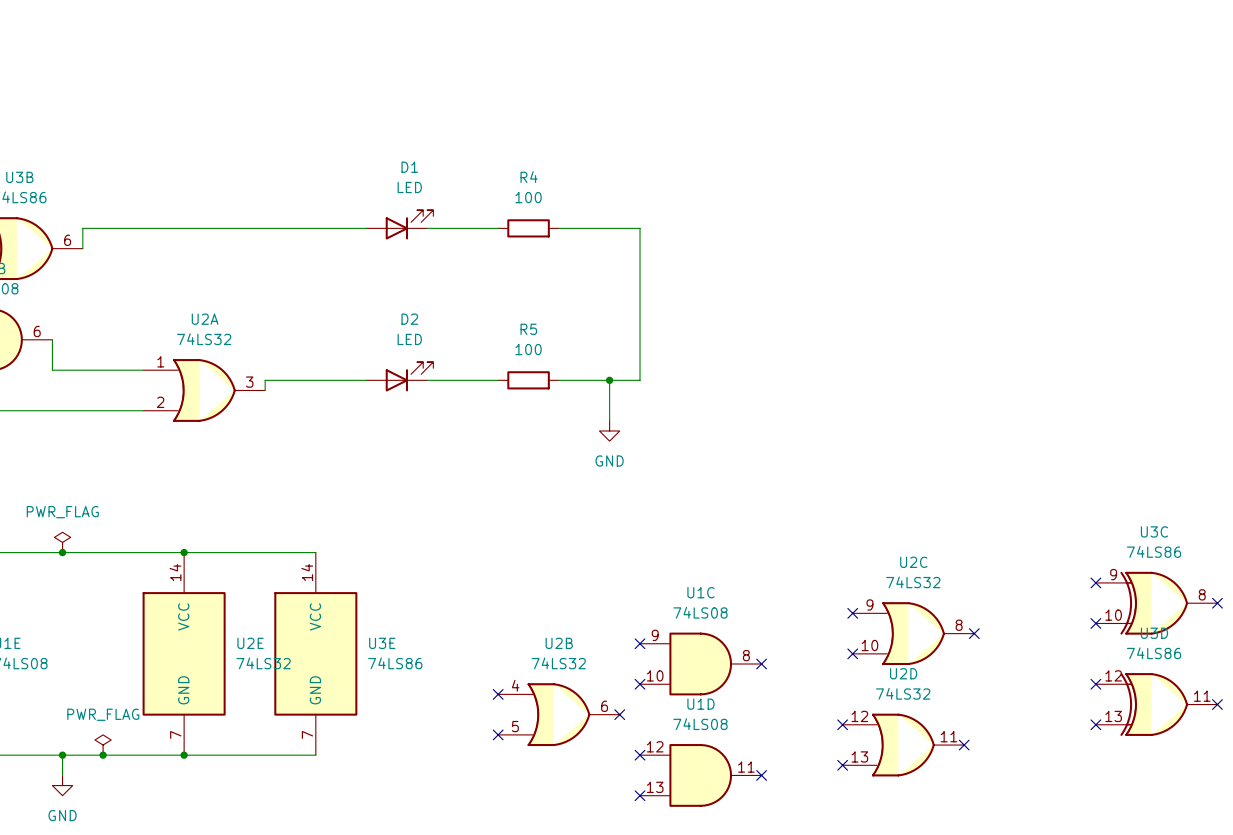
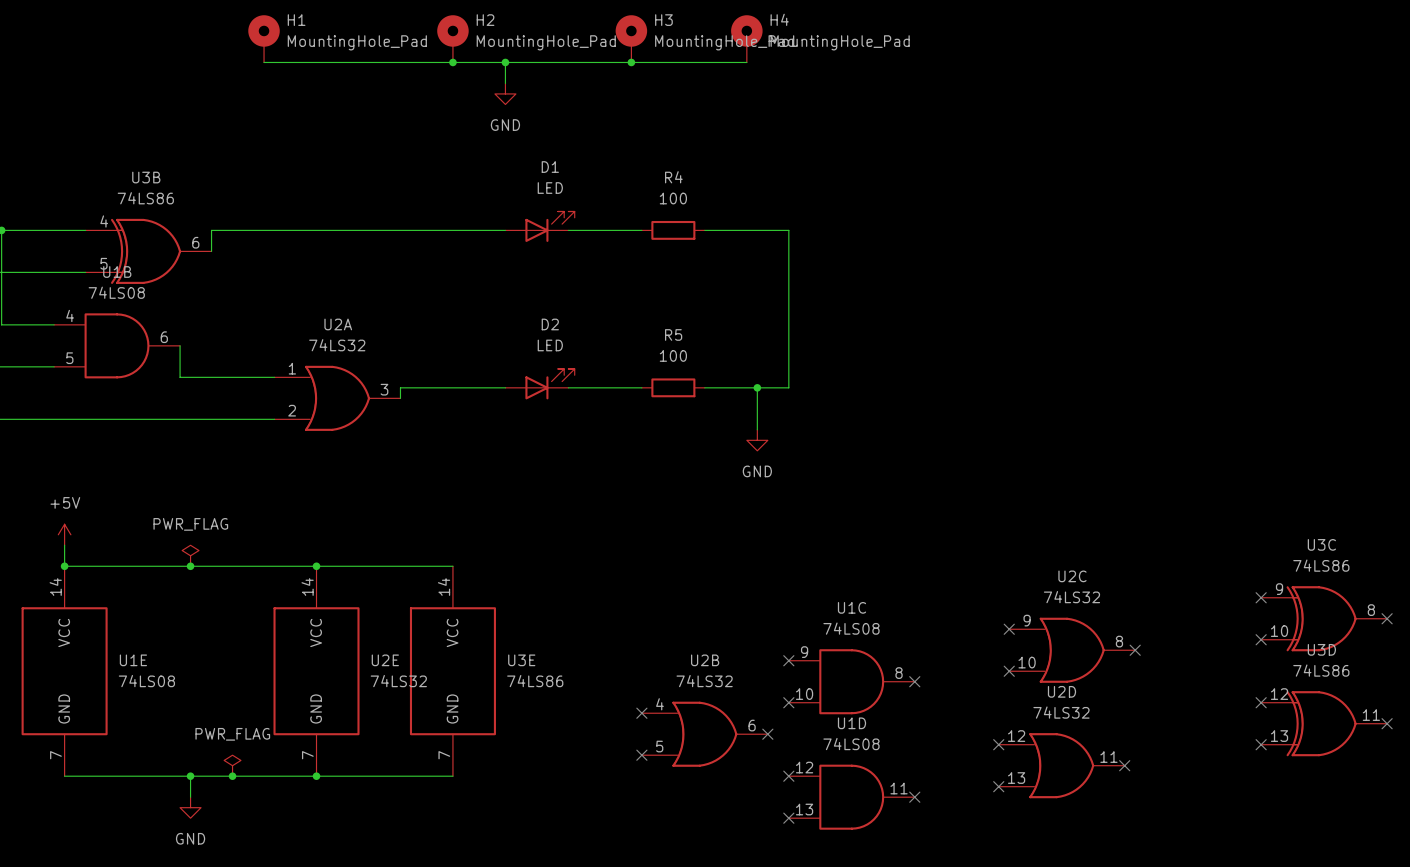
H1: none -> MountingHole_Pad (264, 38)
H2: none -> MountingHole_Pad (452, 38)
H3: none -> MountingHole_Pad (631, 38)
H4: none -> MountingHole_Pad (746, 38)
wire: none -> (264, 62) (746, 62)
junction: none -> (452, 62)
wire: none -> (505, 62) (505, 83)
junction: none -> (505, 62)
junction: none -> (631, 62)
power symbol: none -> GND (505, 93)

